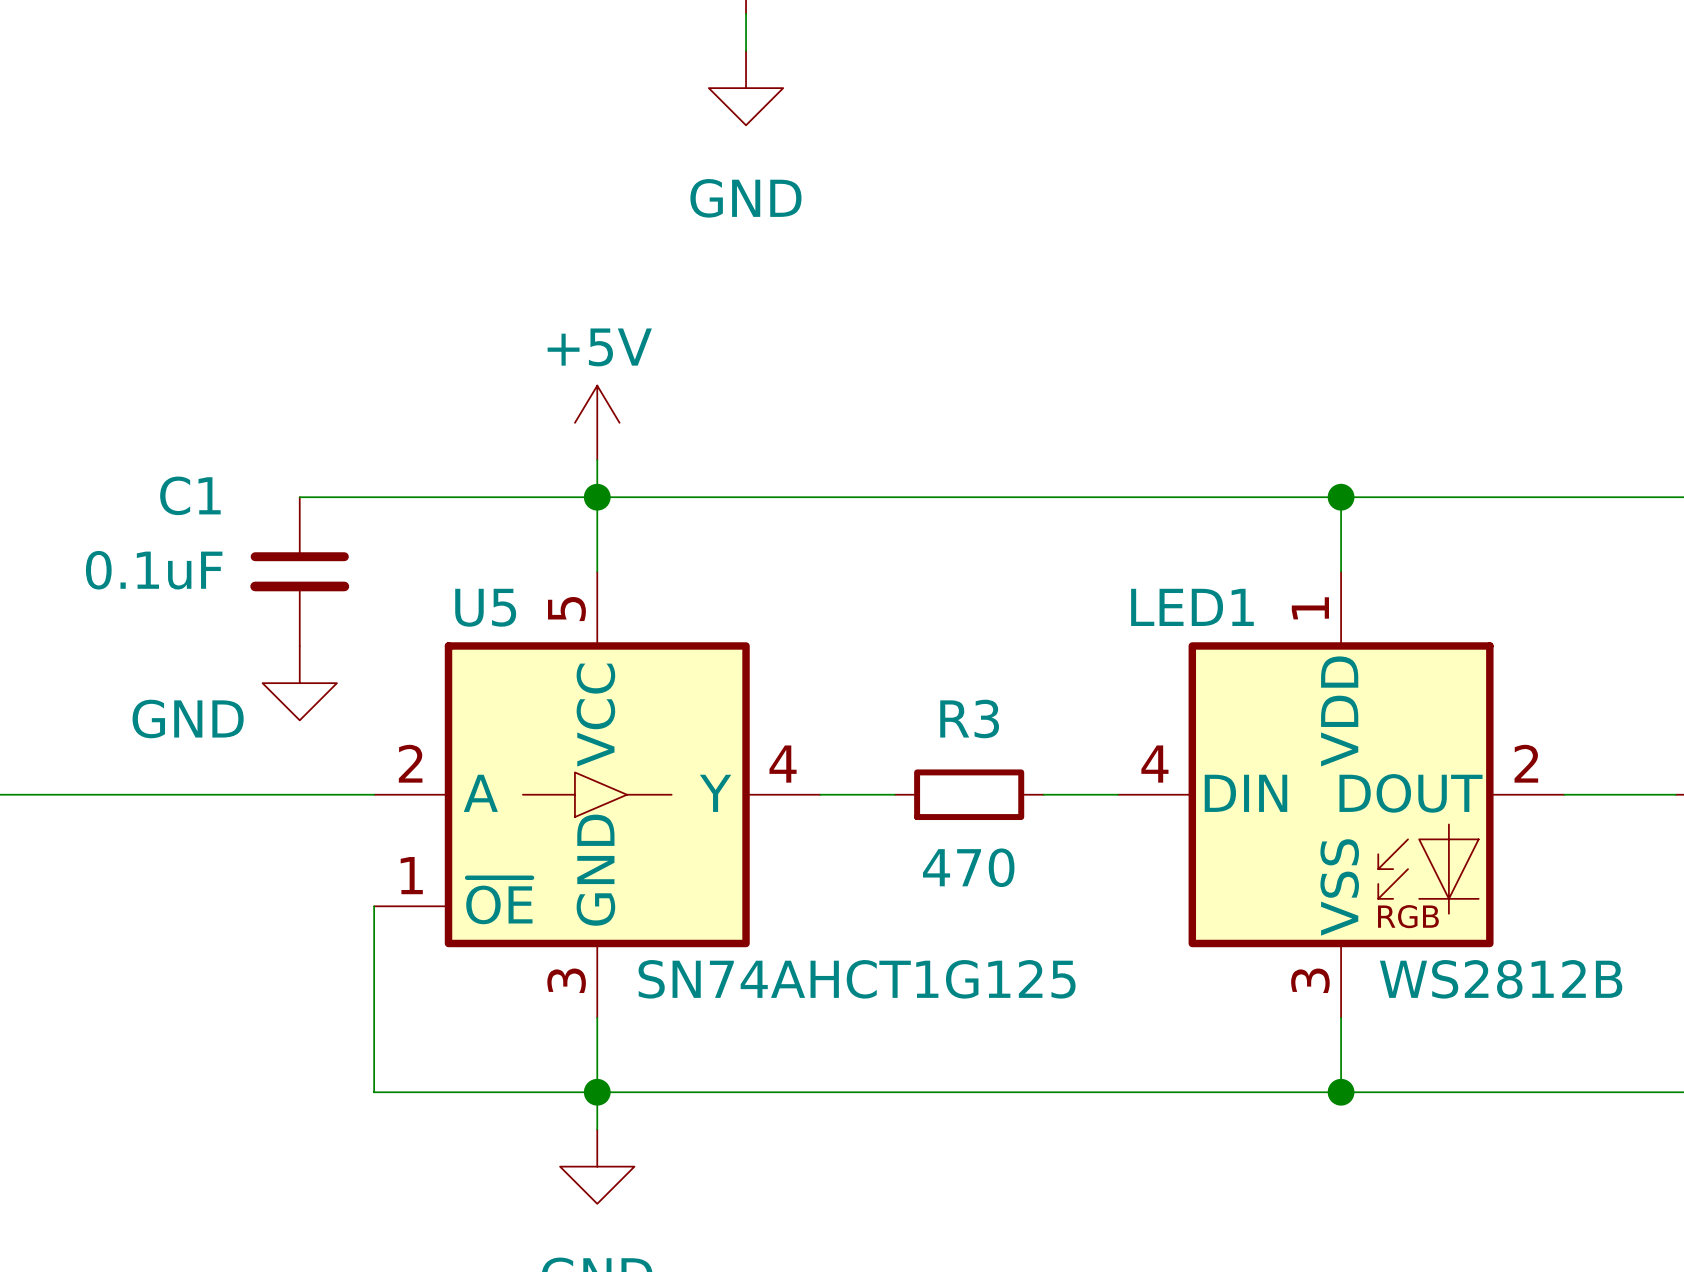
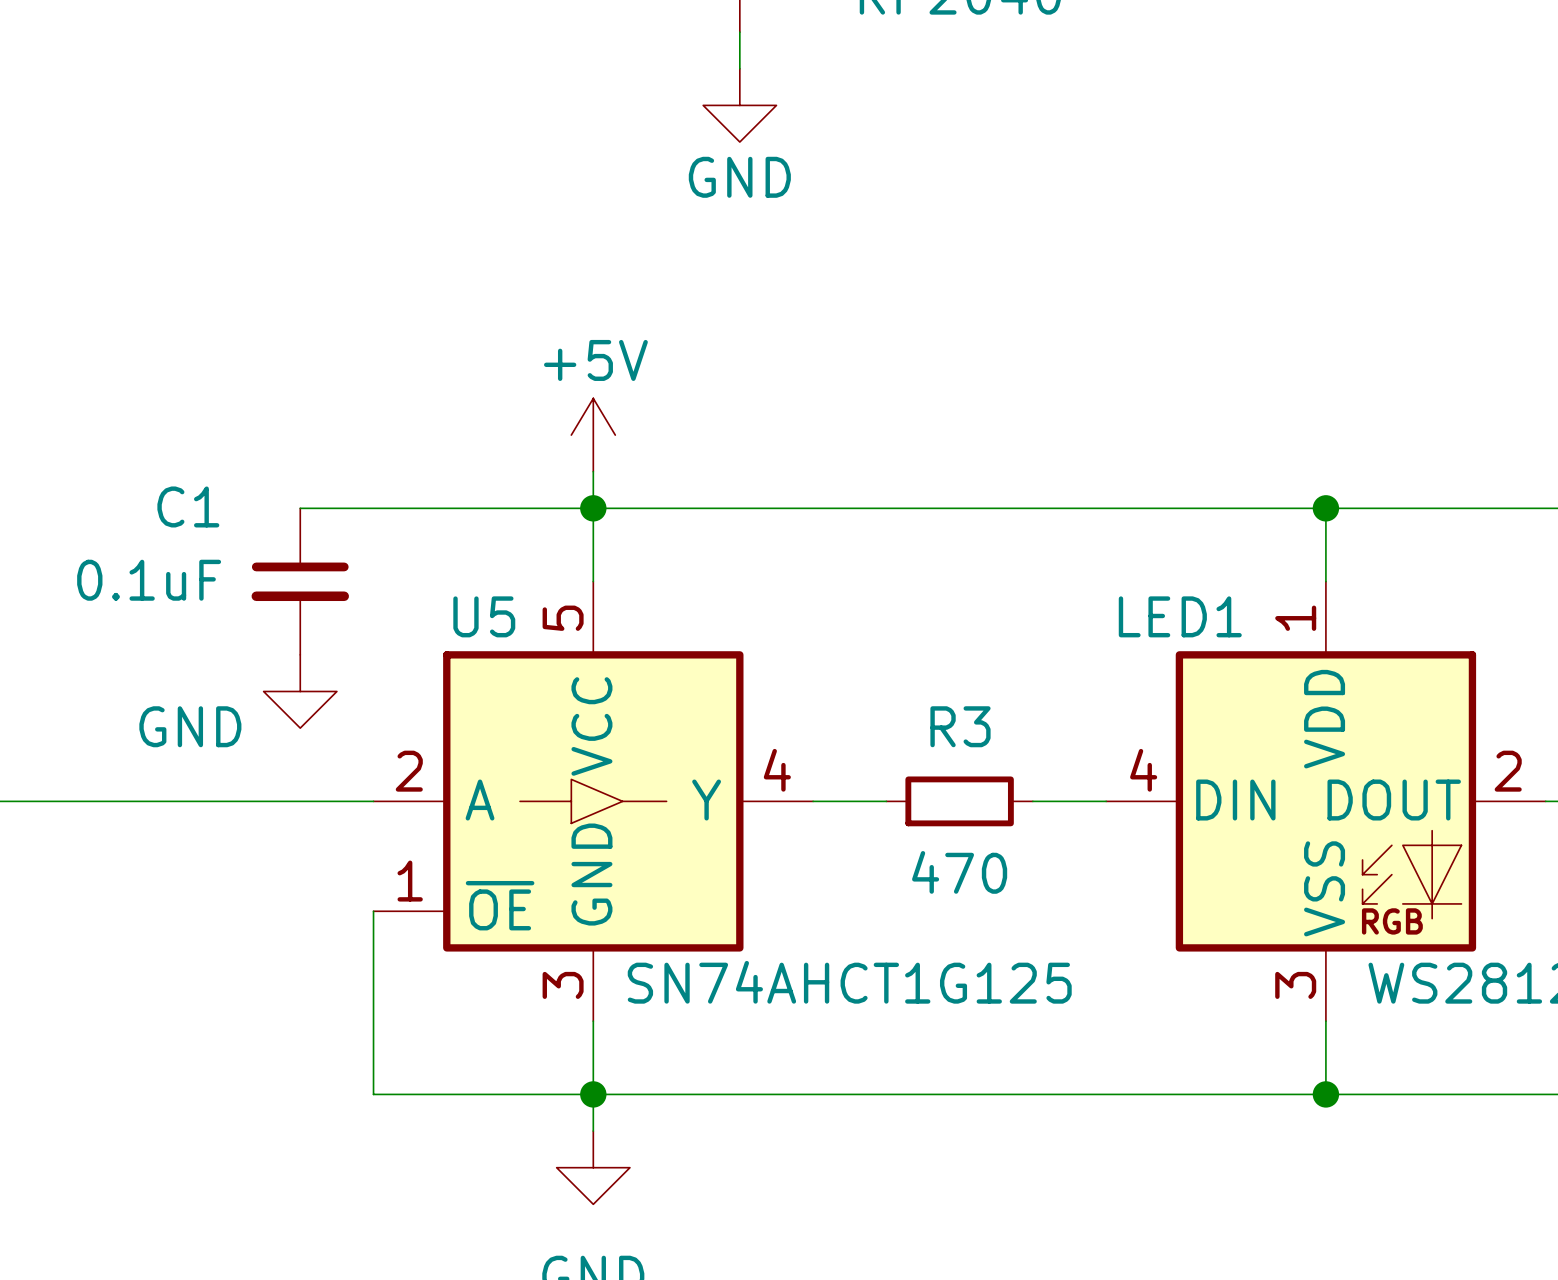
power symbol text position: GND (745, 198) -> GND (739, 177)

